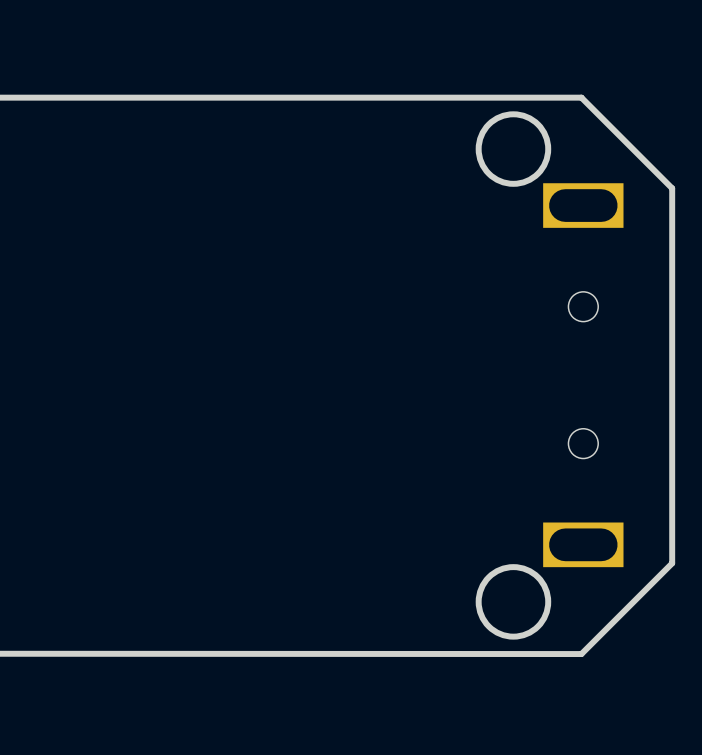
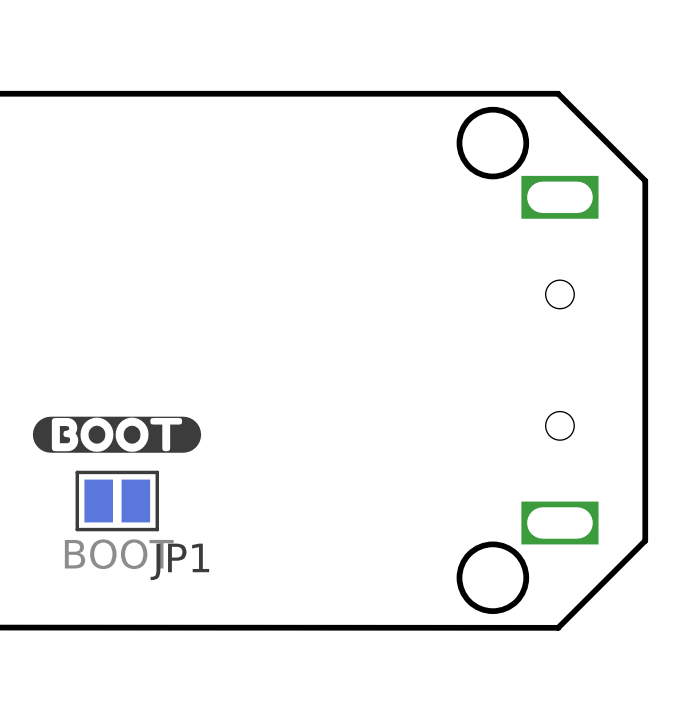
drawing: none -> [32, 416, 202, 453]
JP1: none -> BOOT (117, 501)

